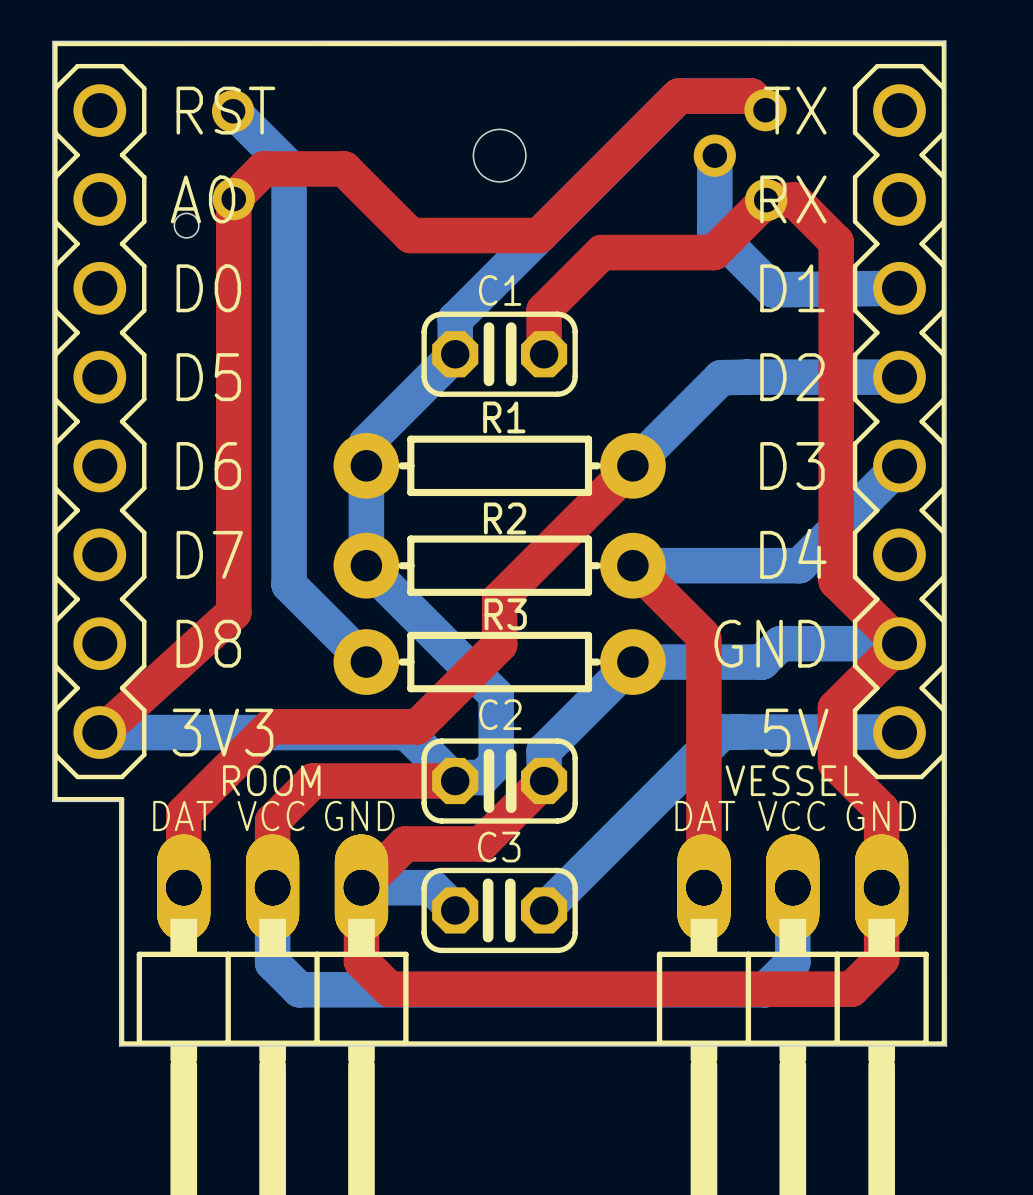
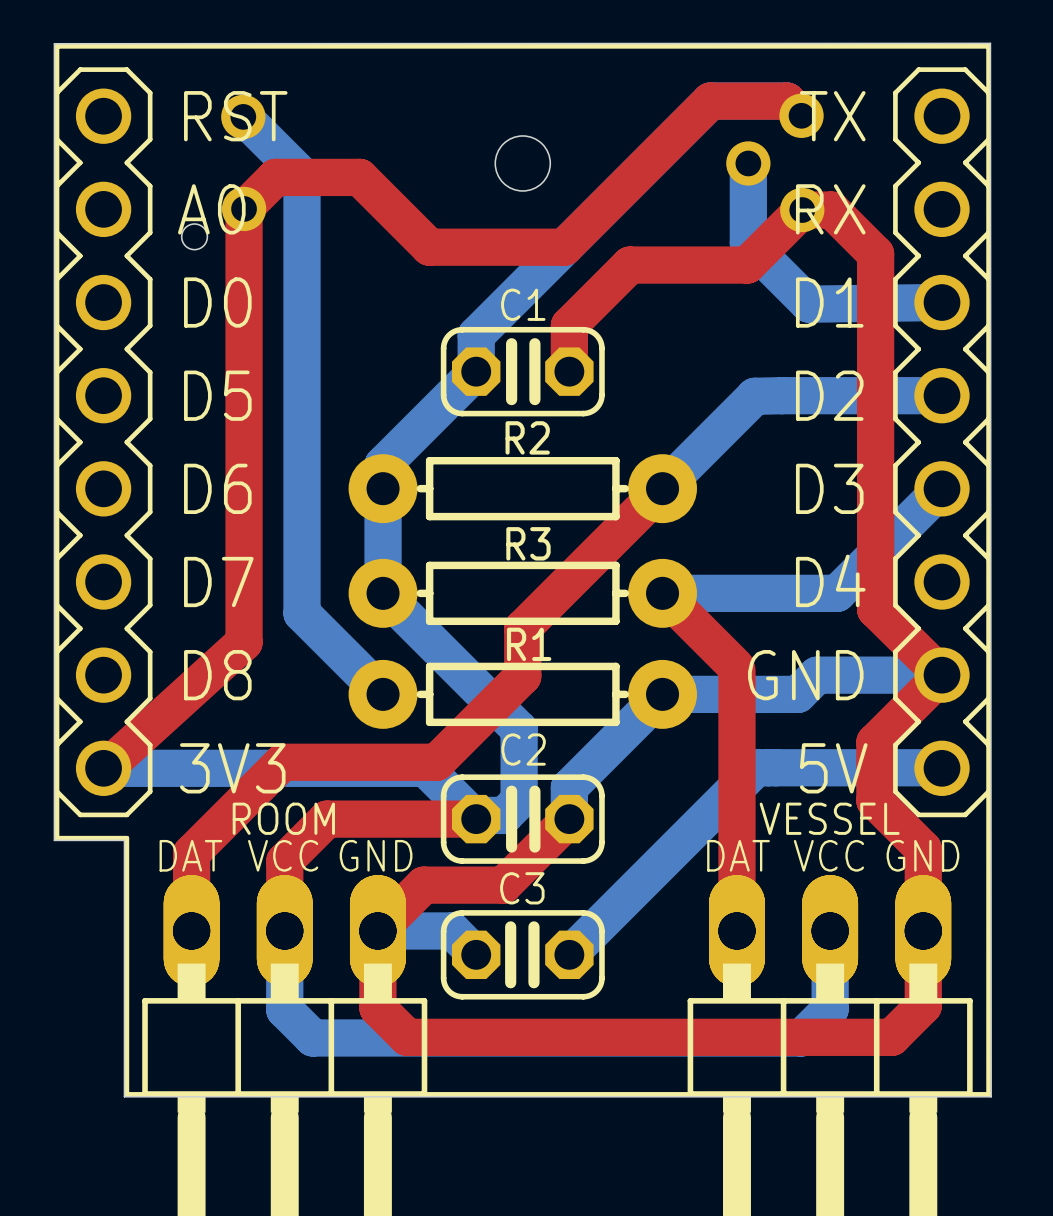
R1 name: R1 (504, 417) -> R2 (527, 437)
R2 name: R2 (505, 518) -> R3 (528, 543)
R3 name: R3 (505, 614) -> R1 (529, 644)

